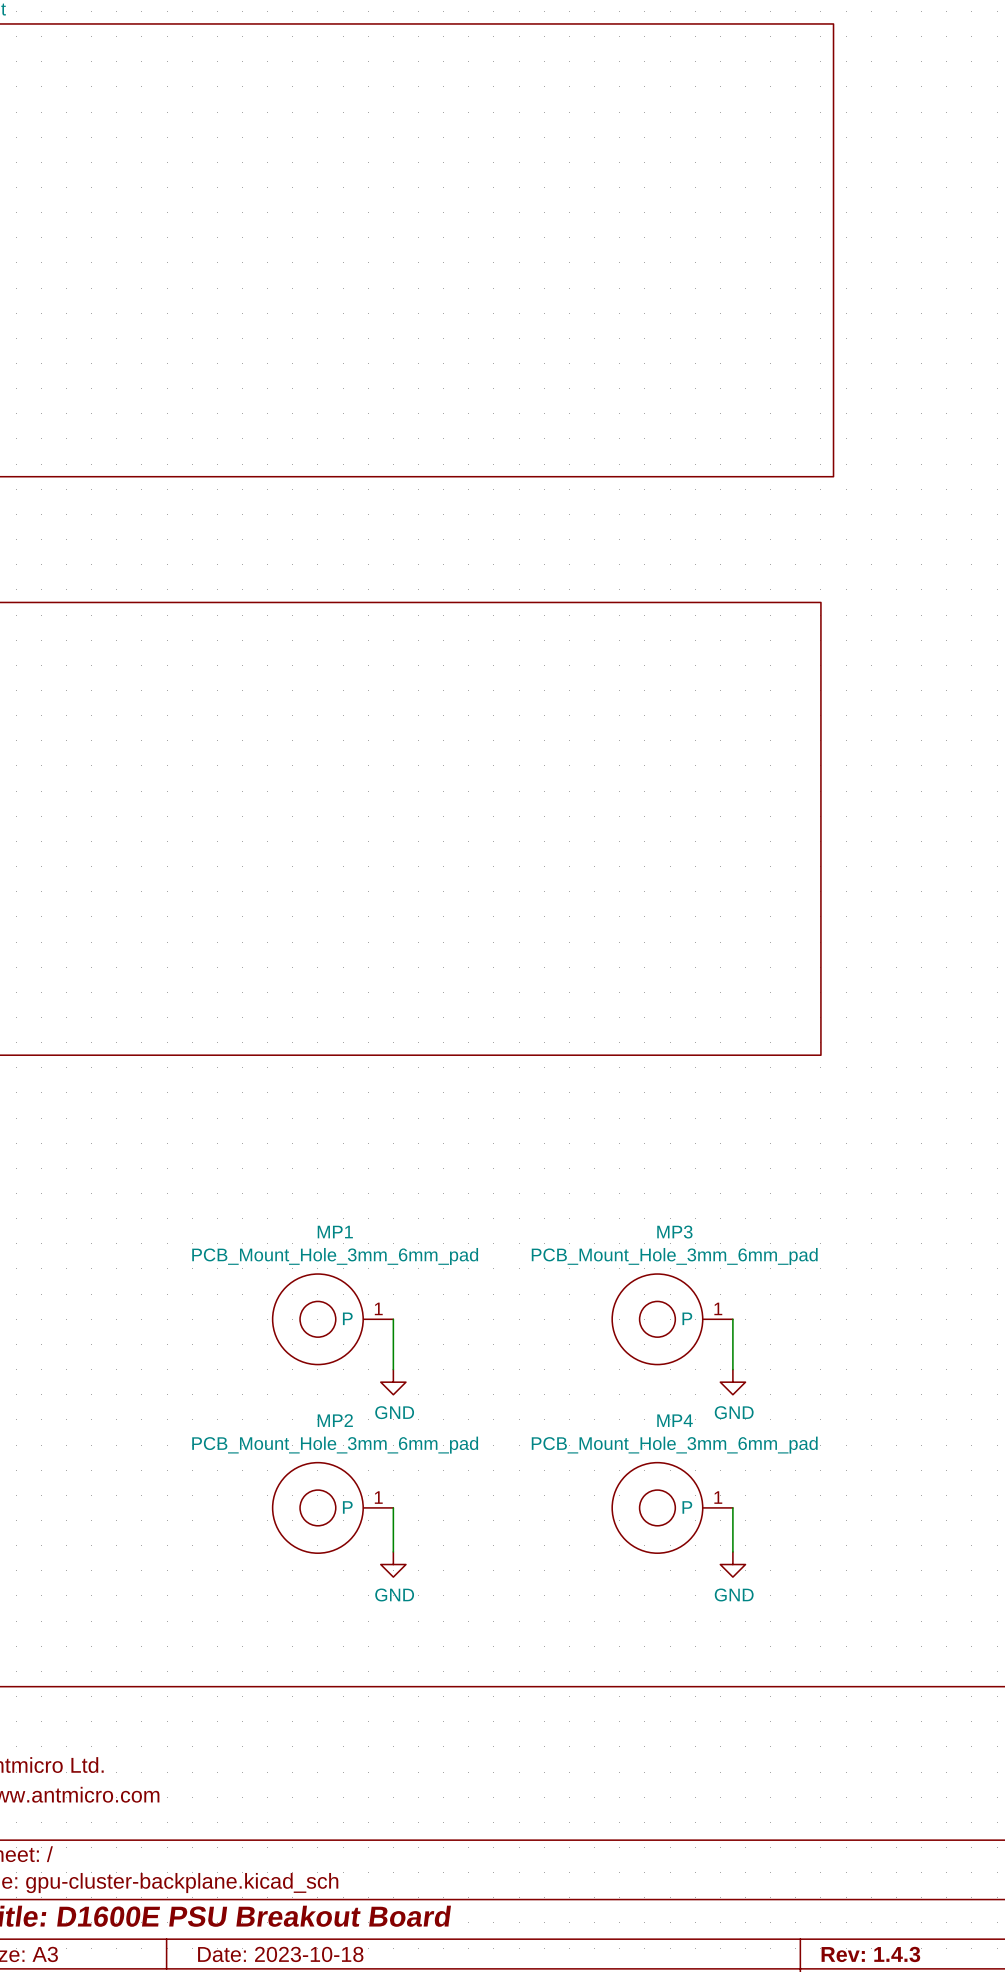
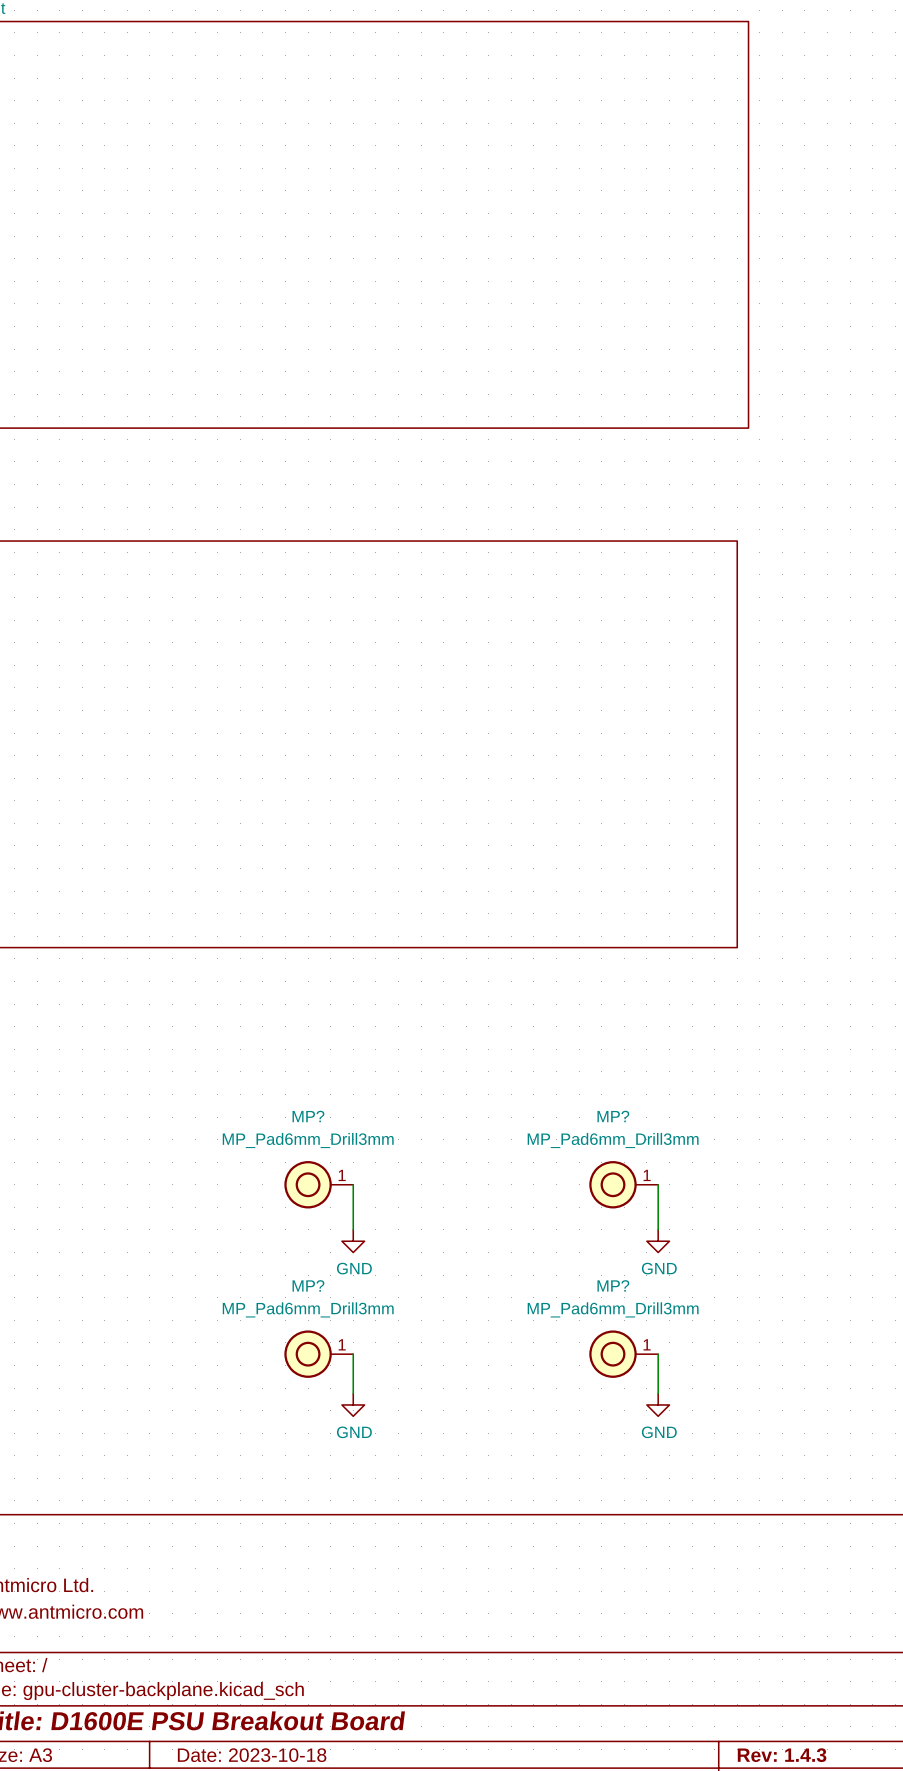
MP1: PCB_Mount_Hole_3mm_6mm_pad (333, 1319) -> none
MP?: none -> MP_Pad6mm_Drill3mm (318, 1184)
MP3: PCB_Mount_Hole_3mm_6mm_pad (672, 1319) -> none
MP?: none -> MP_Pad6mm_Drill3mm (623, 1184)
MP2: PCB_Mount_Hole_3mm_6mm_pad (333, 1507) -> none
MP?: none -> MP_Pad6mm_Drill3mm (318, 1354)
MP4: PCB_Mount_Hole_3mm_6mm_pad (672, 1507) -> none
MP?: none -> MP_Pad6mm_Drill3mm (623, 1354)

